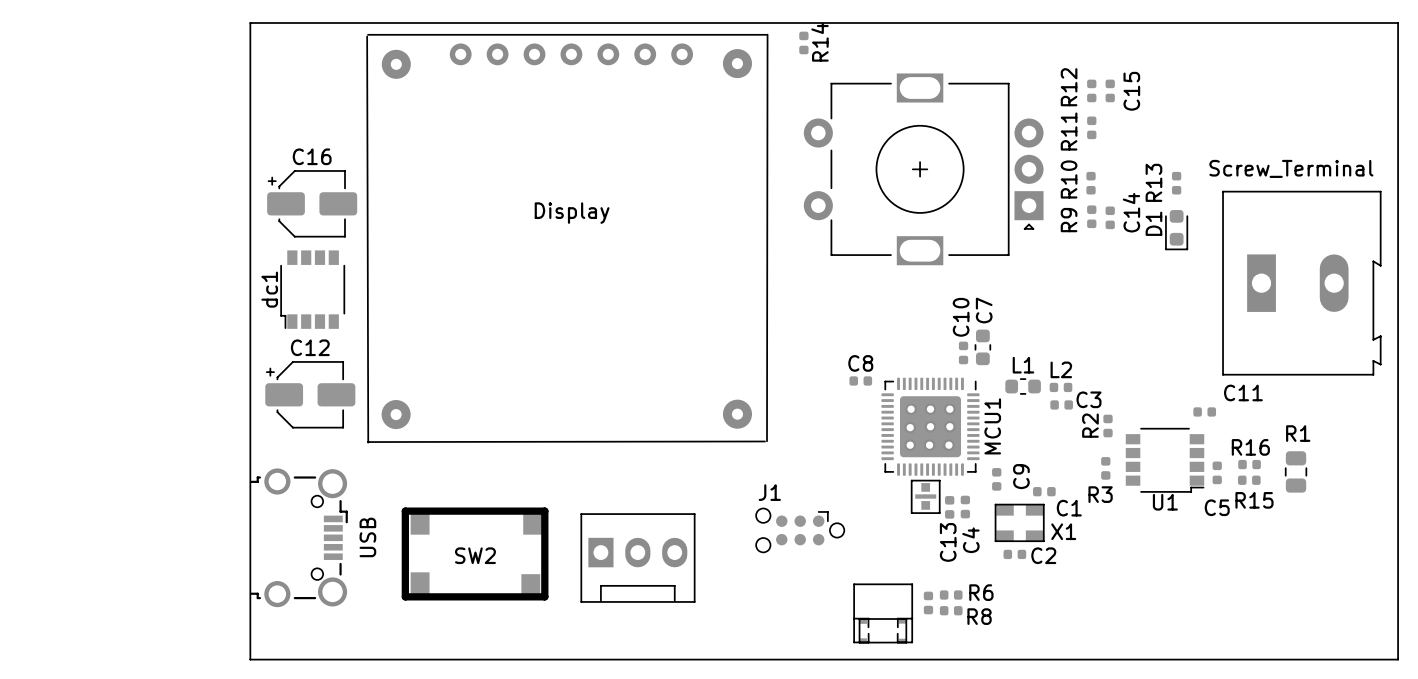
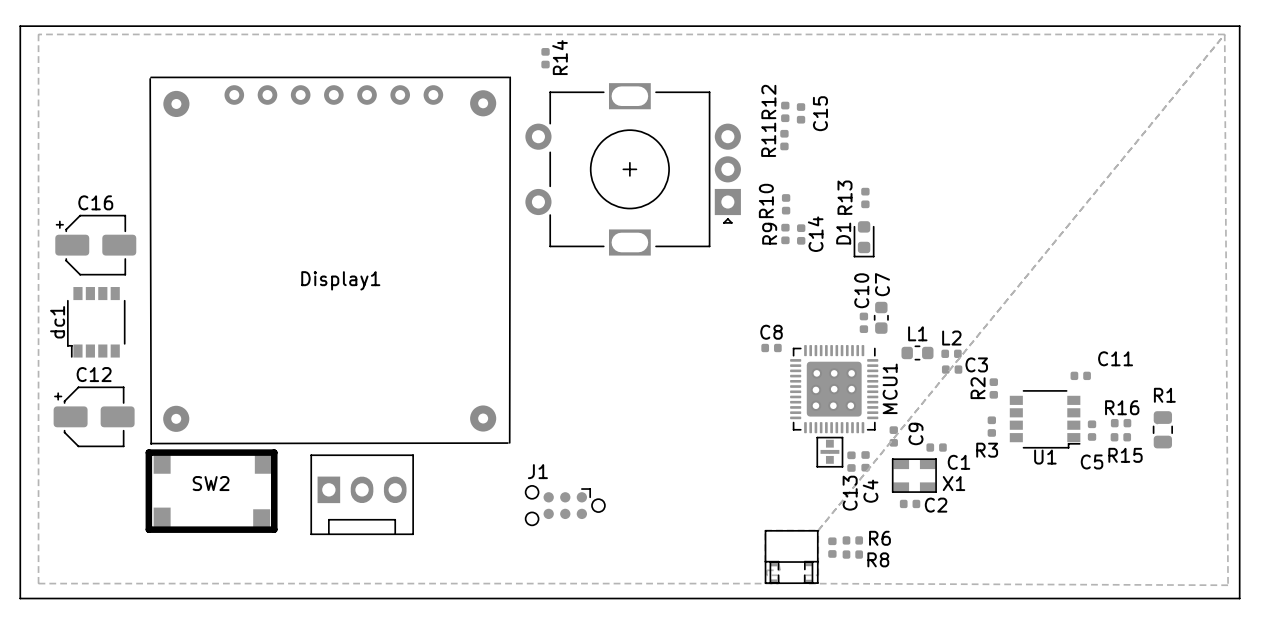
board edge: (250, 22) (250, 659) -> (222, 26) (20, 26) (20, 598) (222, 598)
board edge: (1381, 22) (1398, 22) (1398, 659) (1381, 659) -> (1239, 26) (1239, 598)
zone outline: none -> (1224, 34) (818, 530)
zone outline: none -> (1224, 34) (38, 34) (38, 583) (778, 583) (778, 575) (766, 575) (766, 570) (780, 570) (778, 562) (765, 562) (765, 530) (818, 530)
zone outline: none -> (1224, 34) (1228, 585) (805, 583) (805, 575) (818, 575) (818, 530)
R14 position: (803, 42) -> (545, 58)
R12 name position: R12 (1069, 87) -> R12 (768, 101)
R12 position: (1091, 90) -> (785, 111)
C15 position: (1110, 90) -> (801, 113)
R11 position: (1091, 127) -> (784, 140)
R11 name position: R11 (1069, 131) -> R11 (768, 139)
part position: (923, 169) -> (633, 169)
R10 position: (1091, 183) -> (786, 204)
R13 position: (1176, 183) -> (865, 197)
C16 position: (312, 203) -> (95, 245)
C14 name position: C14 (1131, 212) -> C14 (815, 234)
R9 position: (1091, 216) -> (785, 233)
C14 position: (1110, 217) -> (801, 234)
R9 name position: R9 (1069, 220) -> R9 (769, 233)
D1 position: (1176, 230) -> (864, 239)
Display: (567, 238) -> none
Display1: none -> (330, 260)
Screw_Terminal: (1301, 283) -> none
dc1 position: (312, 289) -> (96, 322)
C12 position: (310, 394) -> (94, 416)
J1 position: (800, 530) -> (565, 505)
USB: (298, 537) -> none
SW2 position: (475, 553) -> (211, 491)
SW2 name position: SW2 (475, 555) -> SW2 (211, 483)
part position: (637, 558) -> (362, 494)

